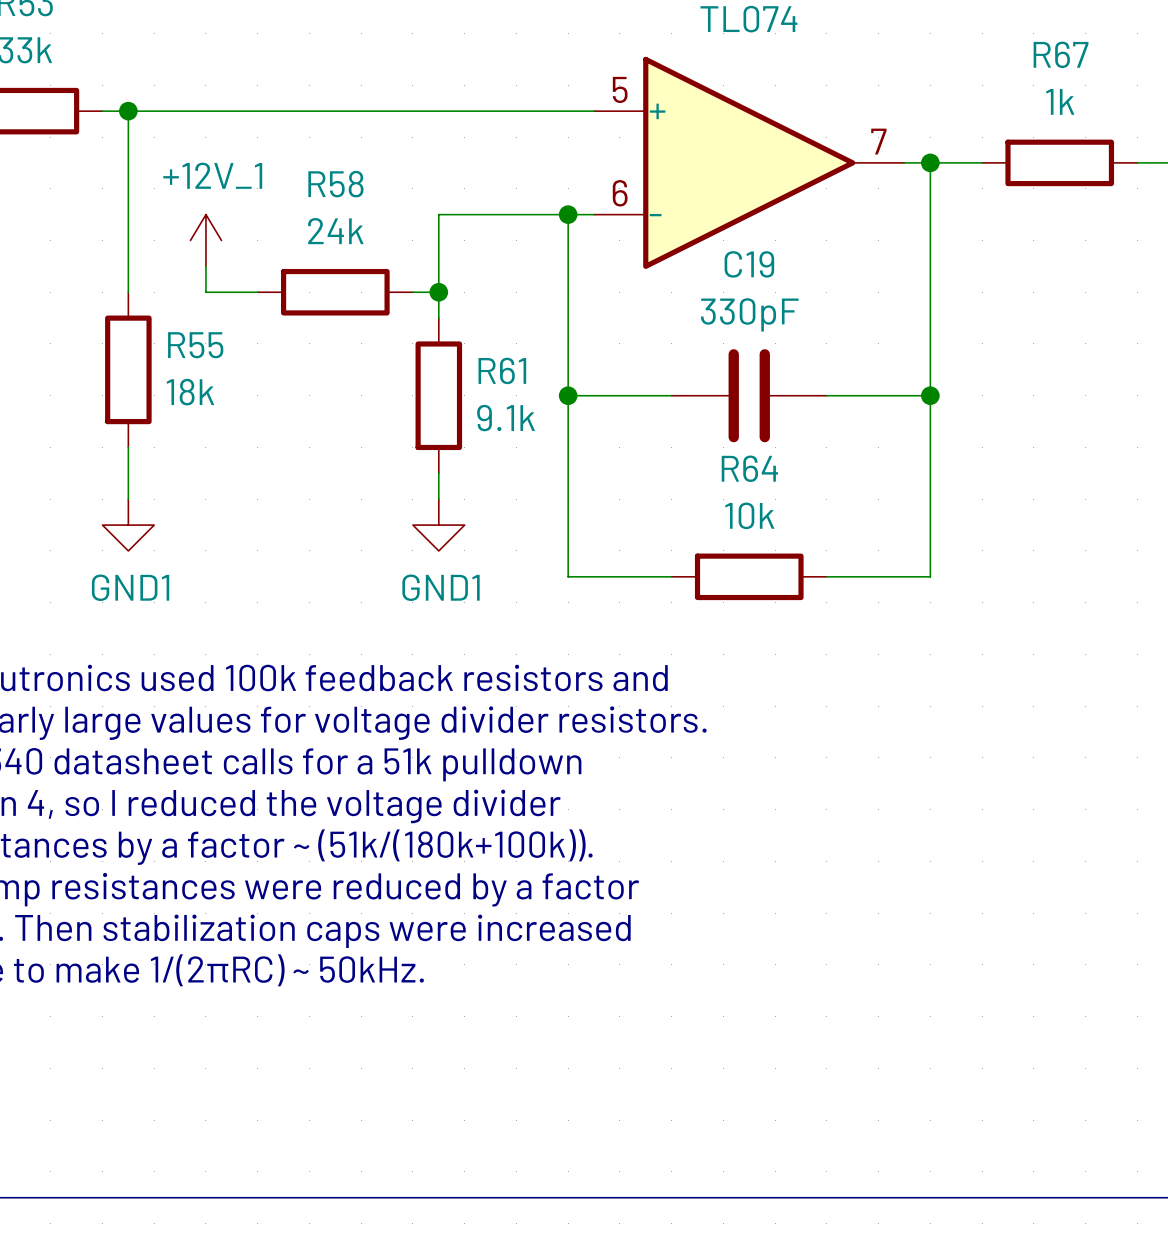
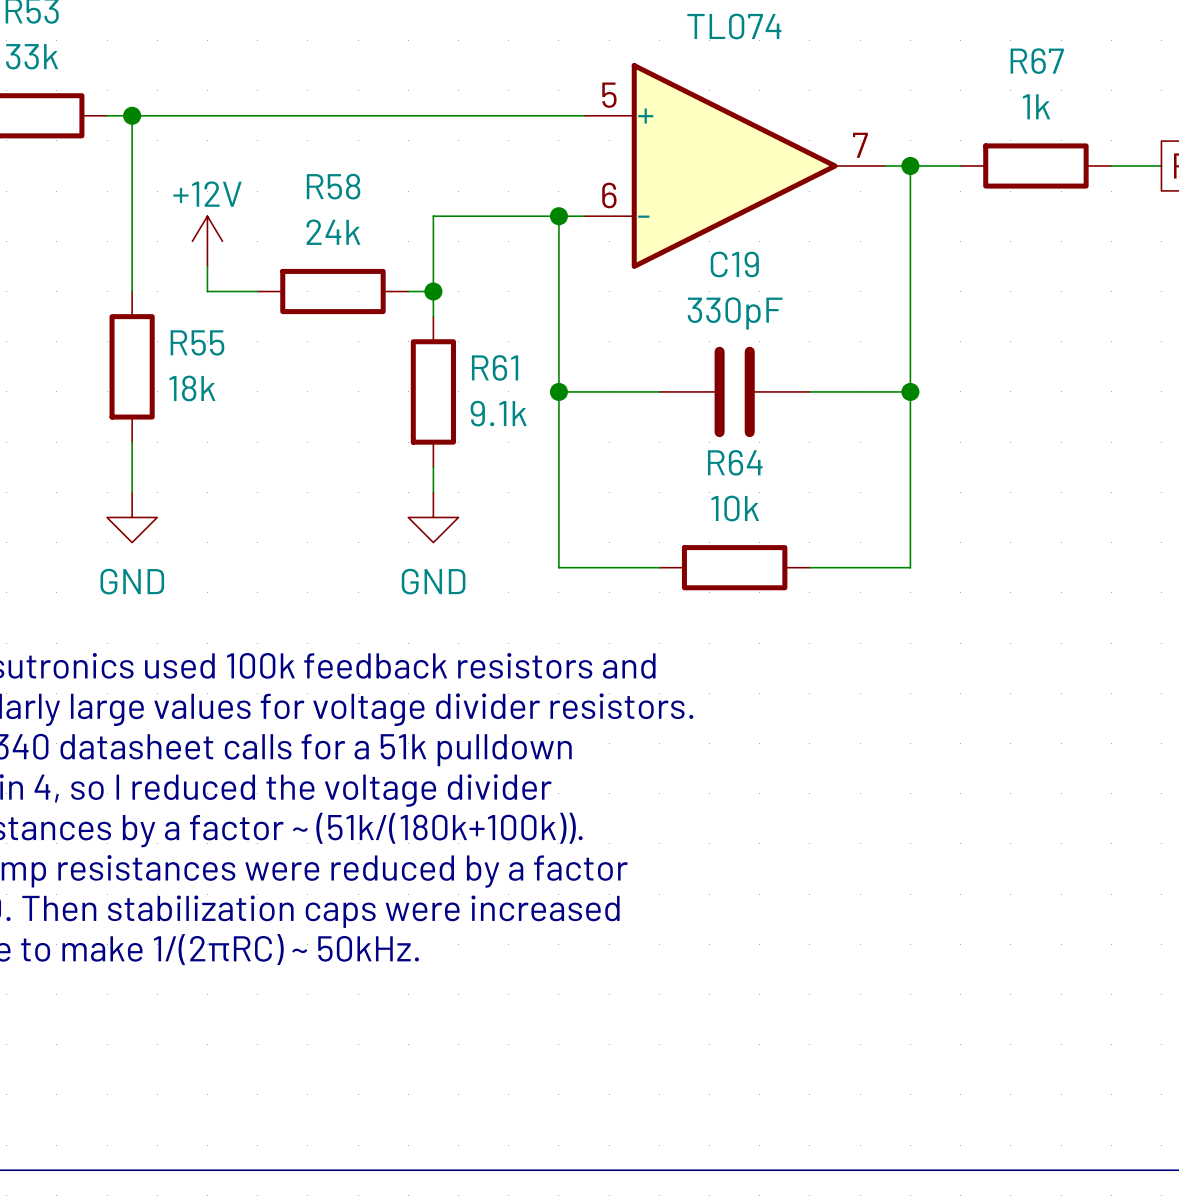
power symbol: +12V_1 (205, 240) -> +12V (207, 241)
power symbol: GND1 (128, 525) -> GND (132, 517)
power symbol: GND1 (438, 525) -> GND (433, 517)

